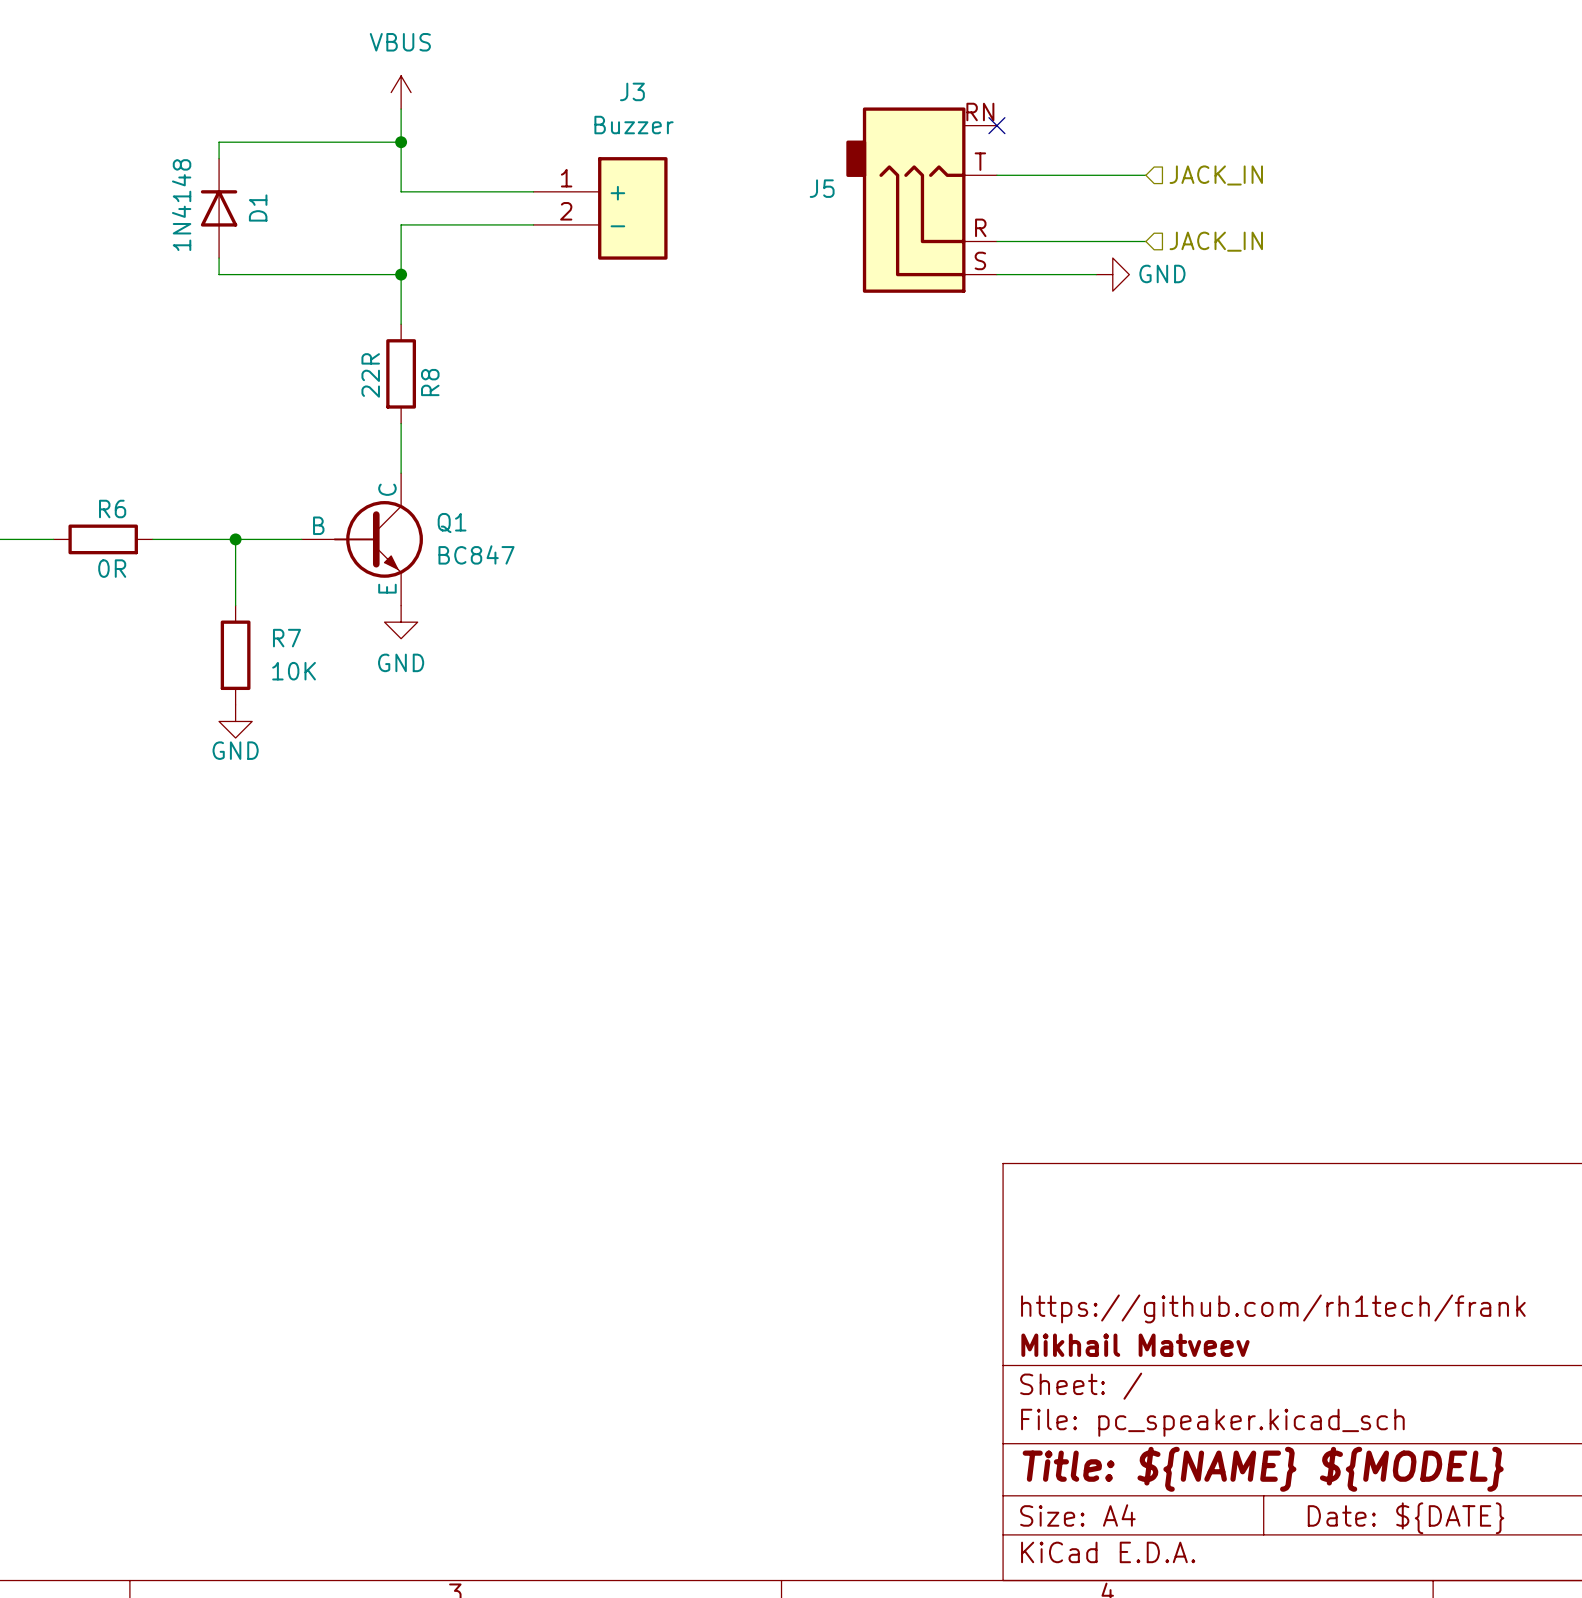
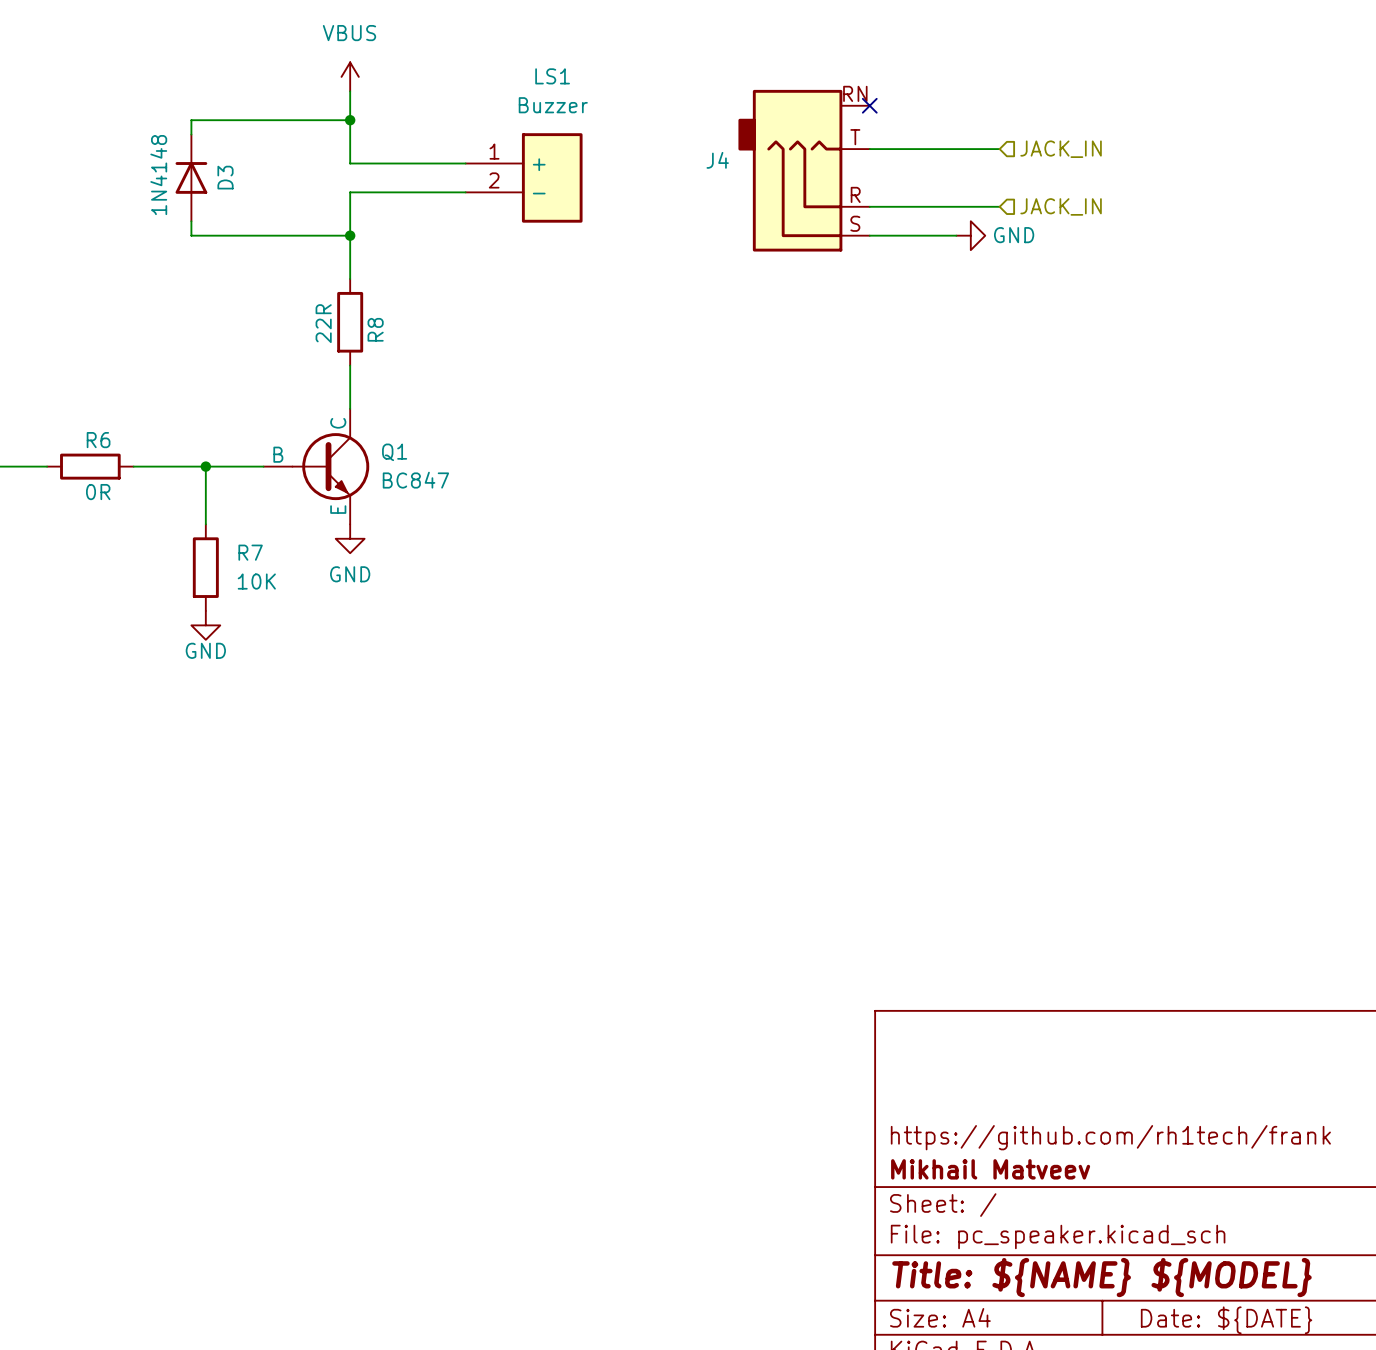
J3 name: J3 (632, 91) -> LS1 (552, 76)
J5 name: J5 (822, 188) -> J4 (717, 160)
D1 name: D1 (258, 208) -> D3 (225, 177)

